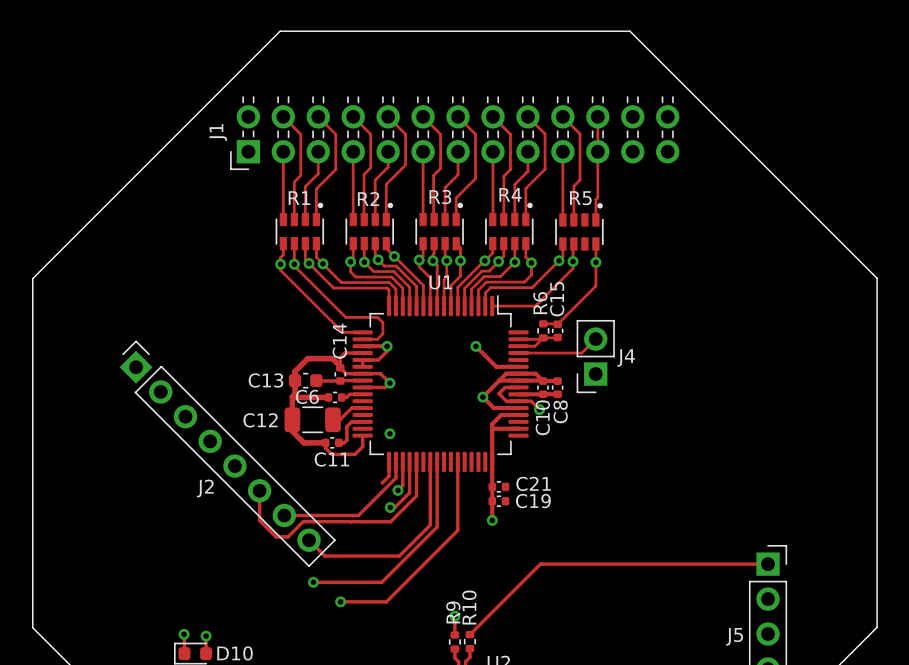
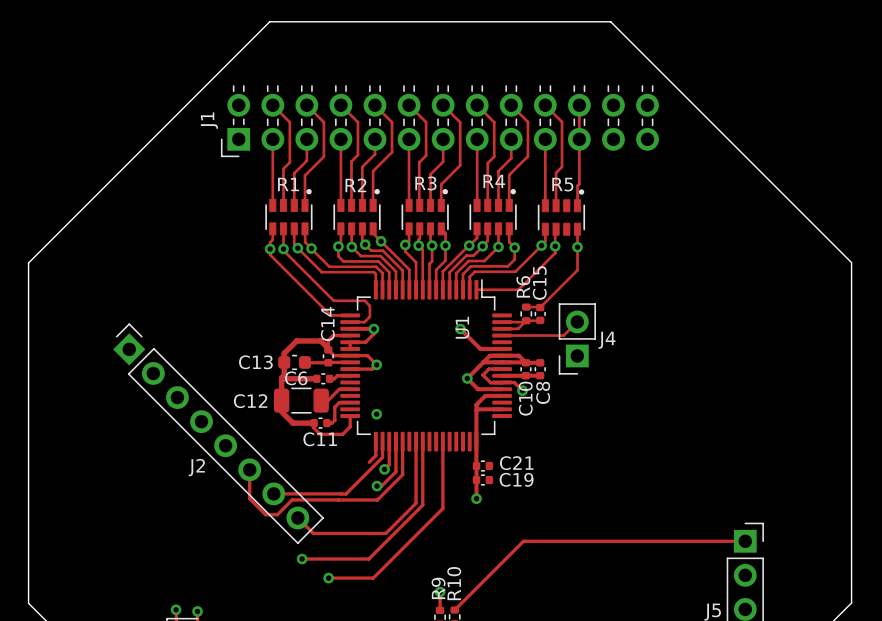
U1 name rotation: 0° (440, 282) -> 90° counterclockwise (462, 327)
U1 name position: U1 (440, 282) -> U1 (462, 327)

